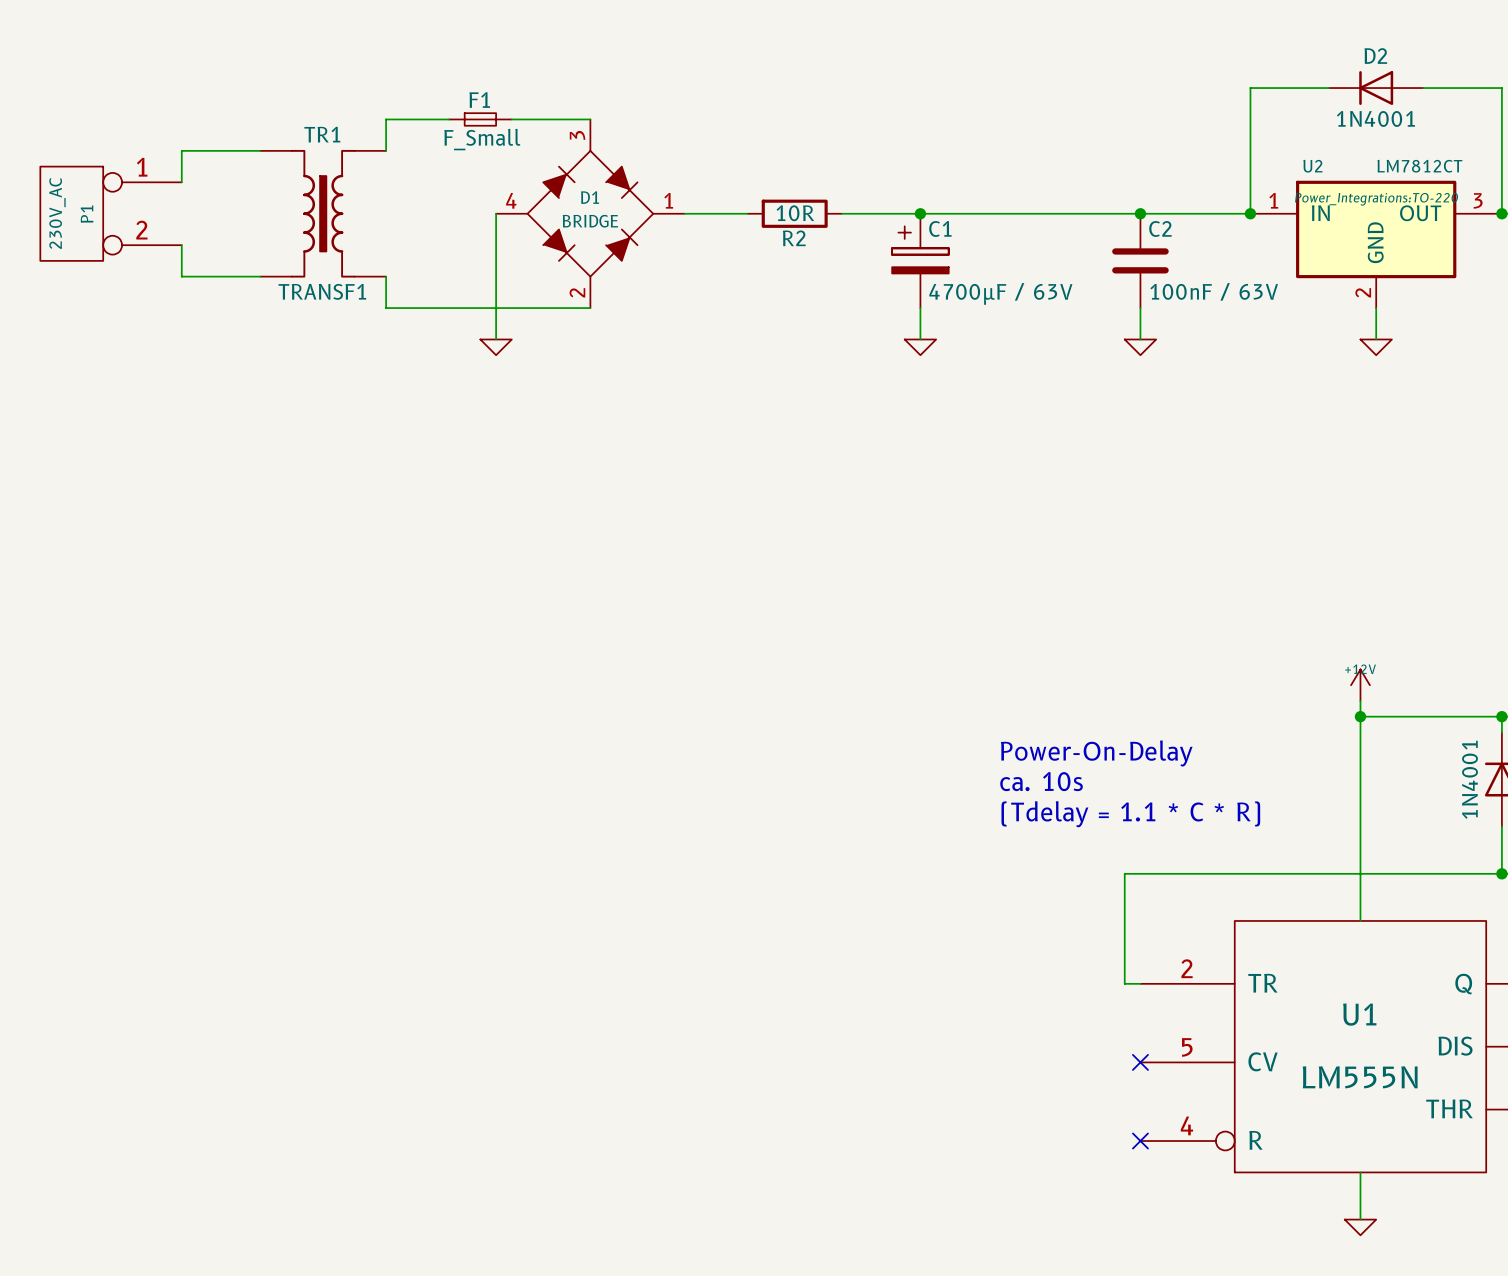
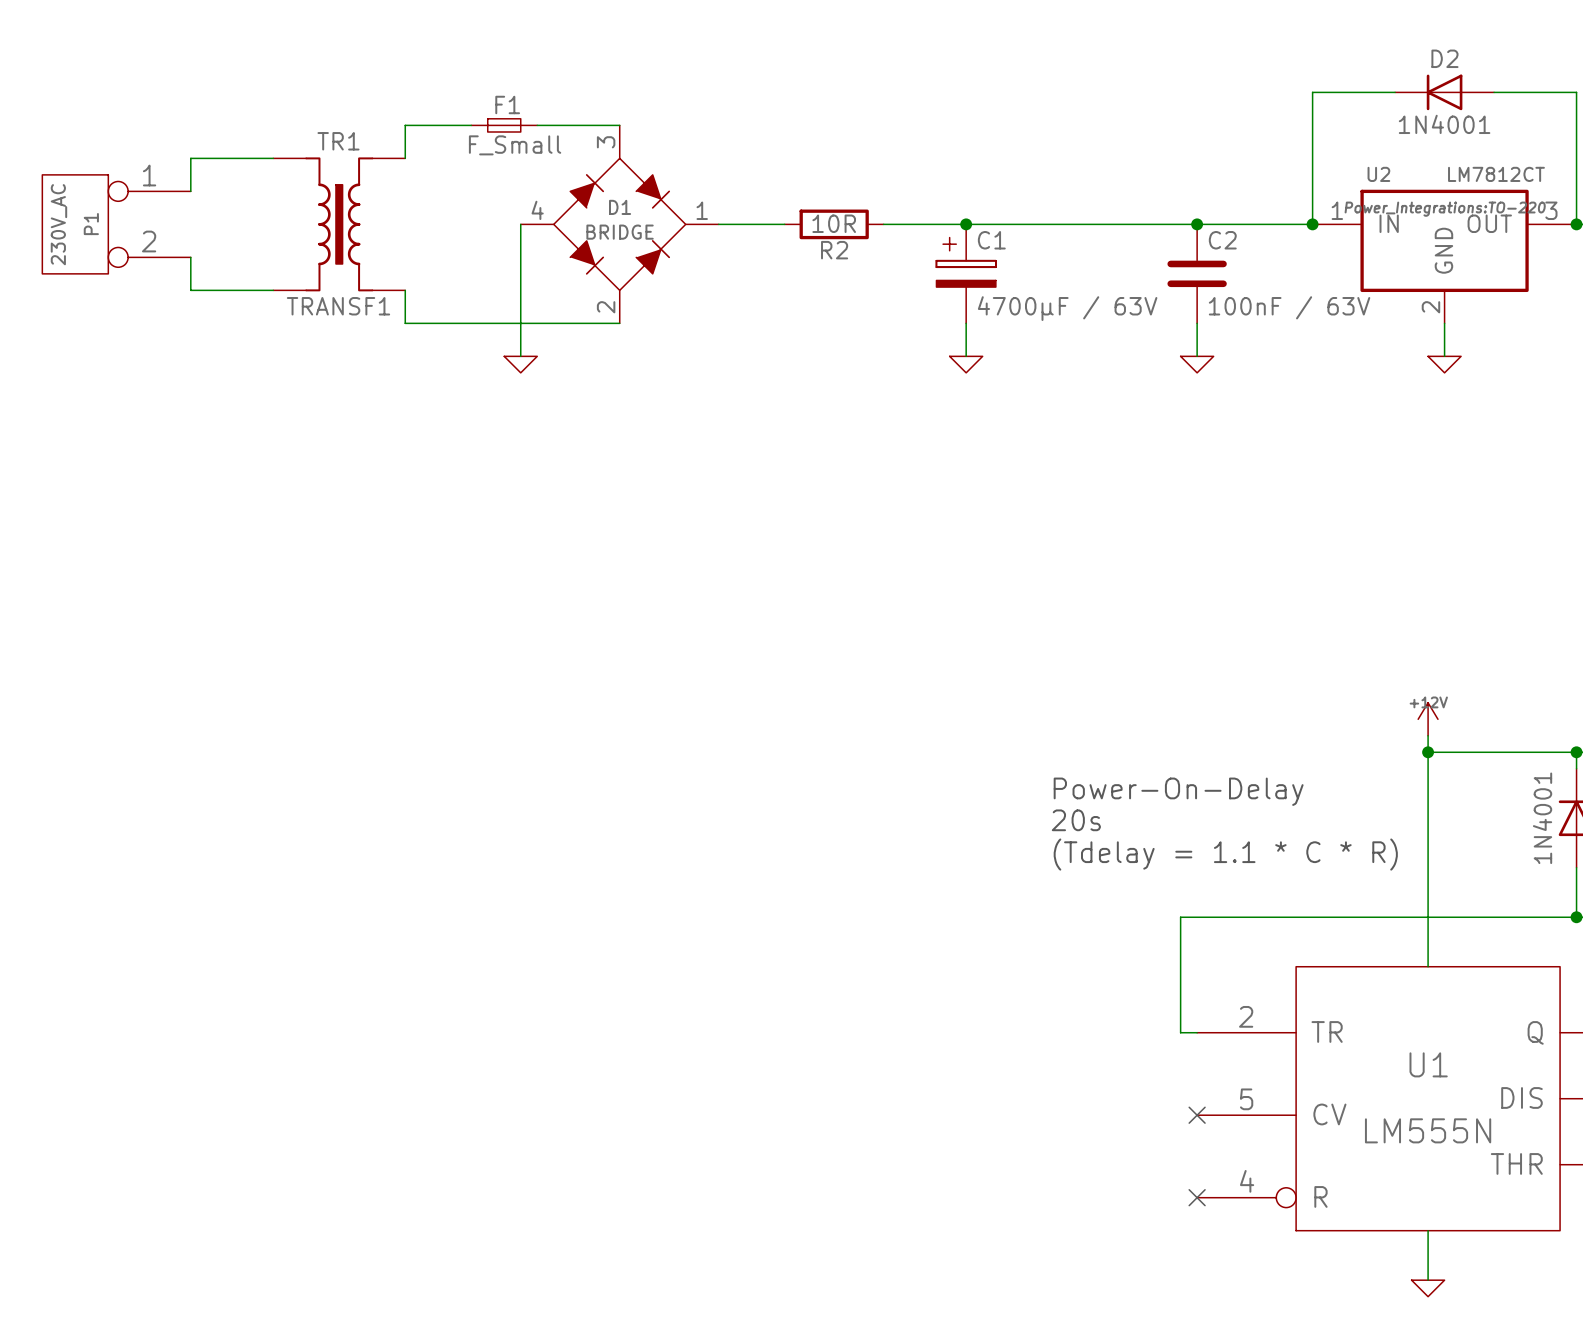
text: ca. 10s (1041, 781) -> 20s (1076, 820)

